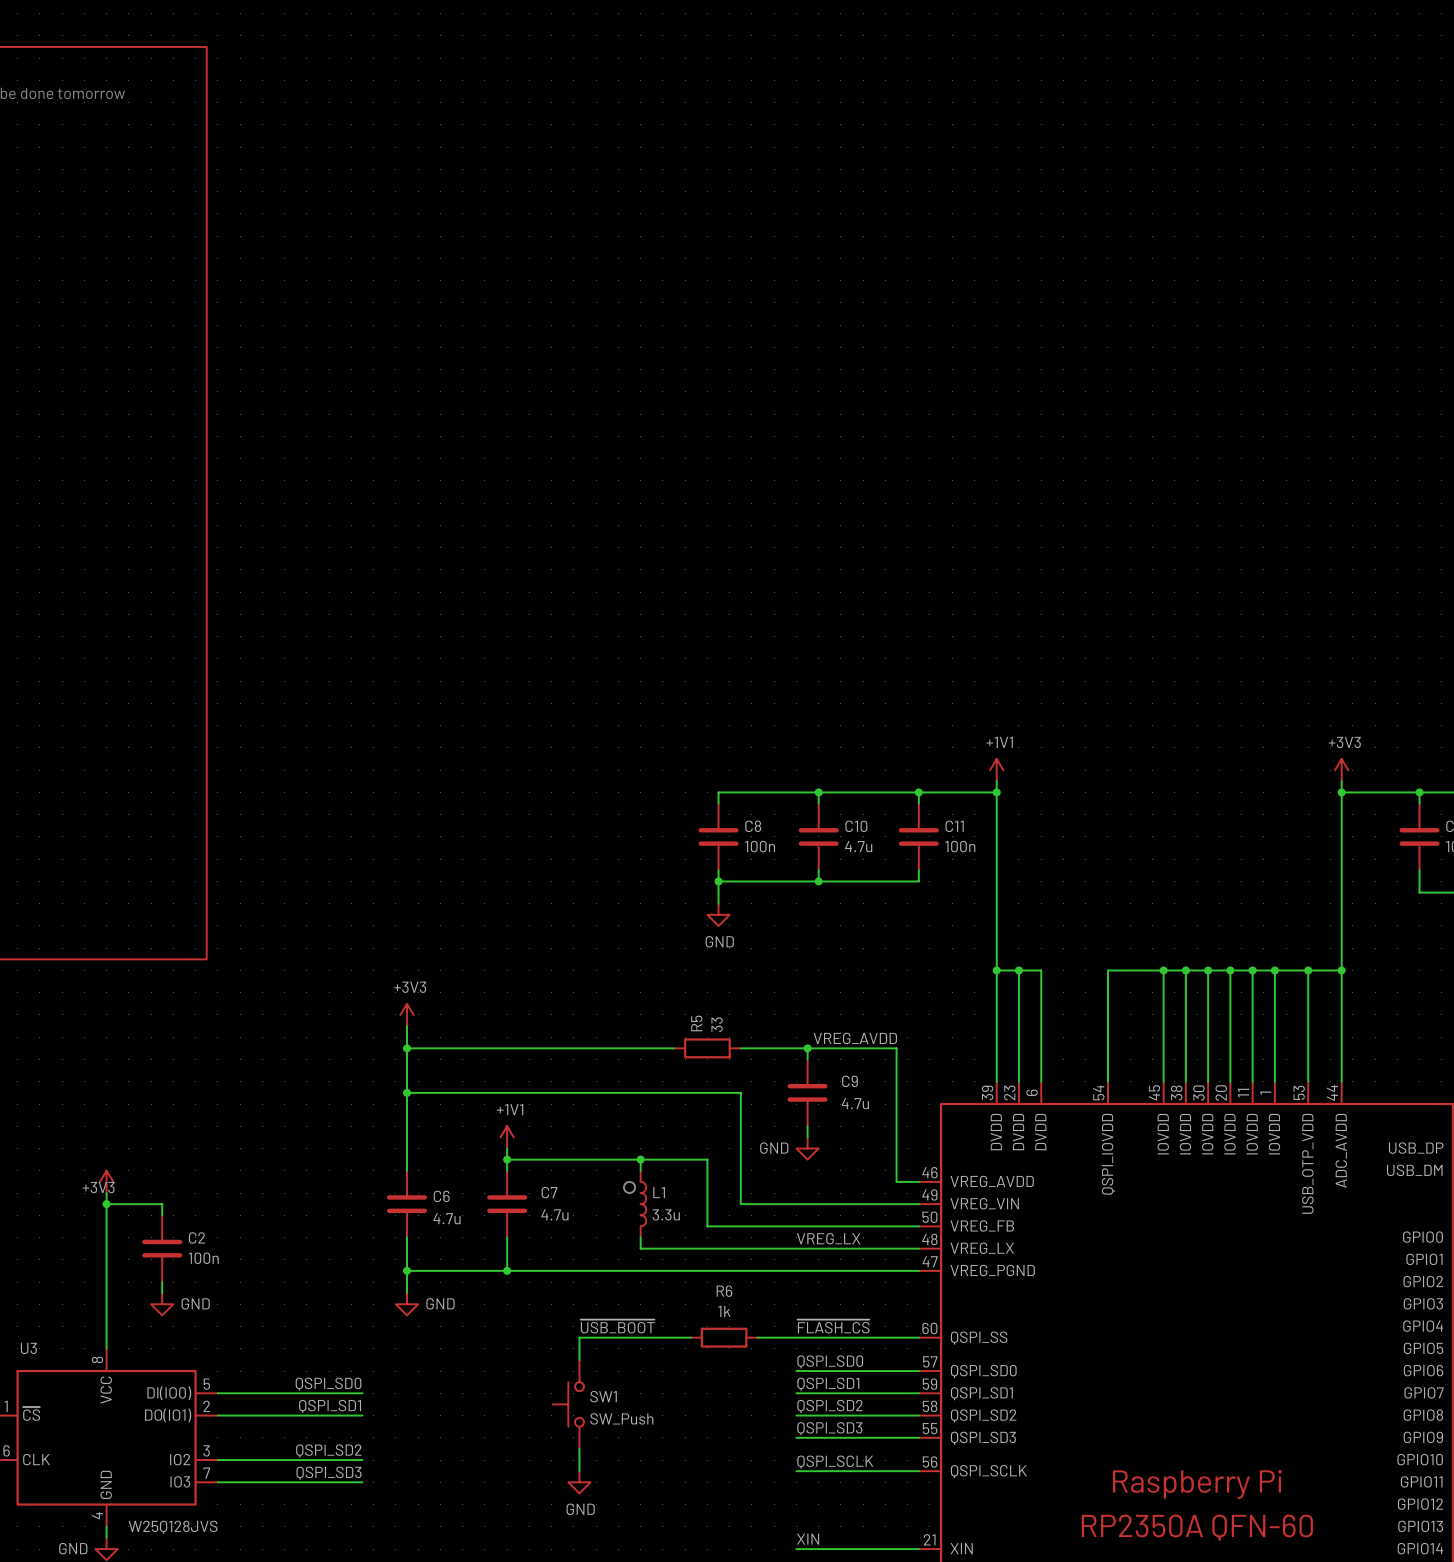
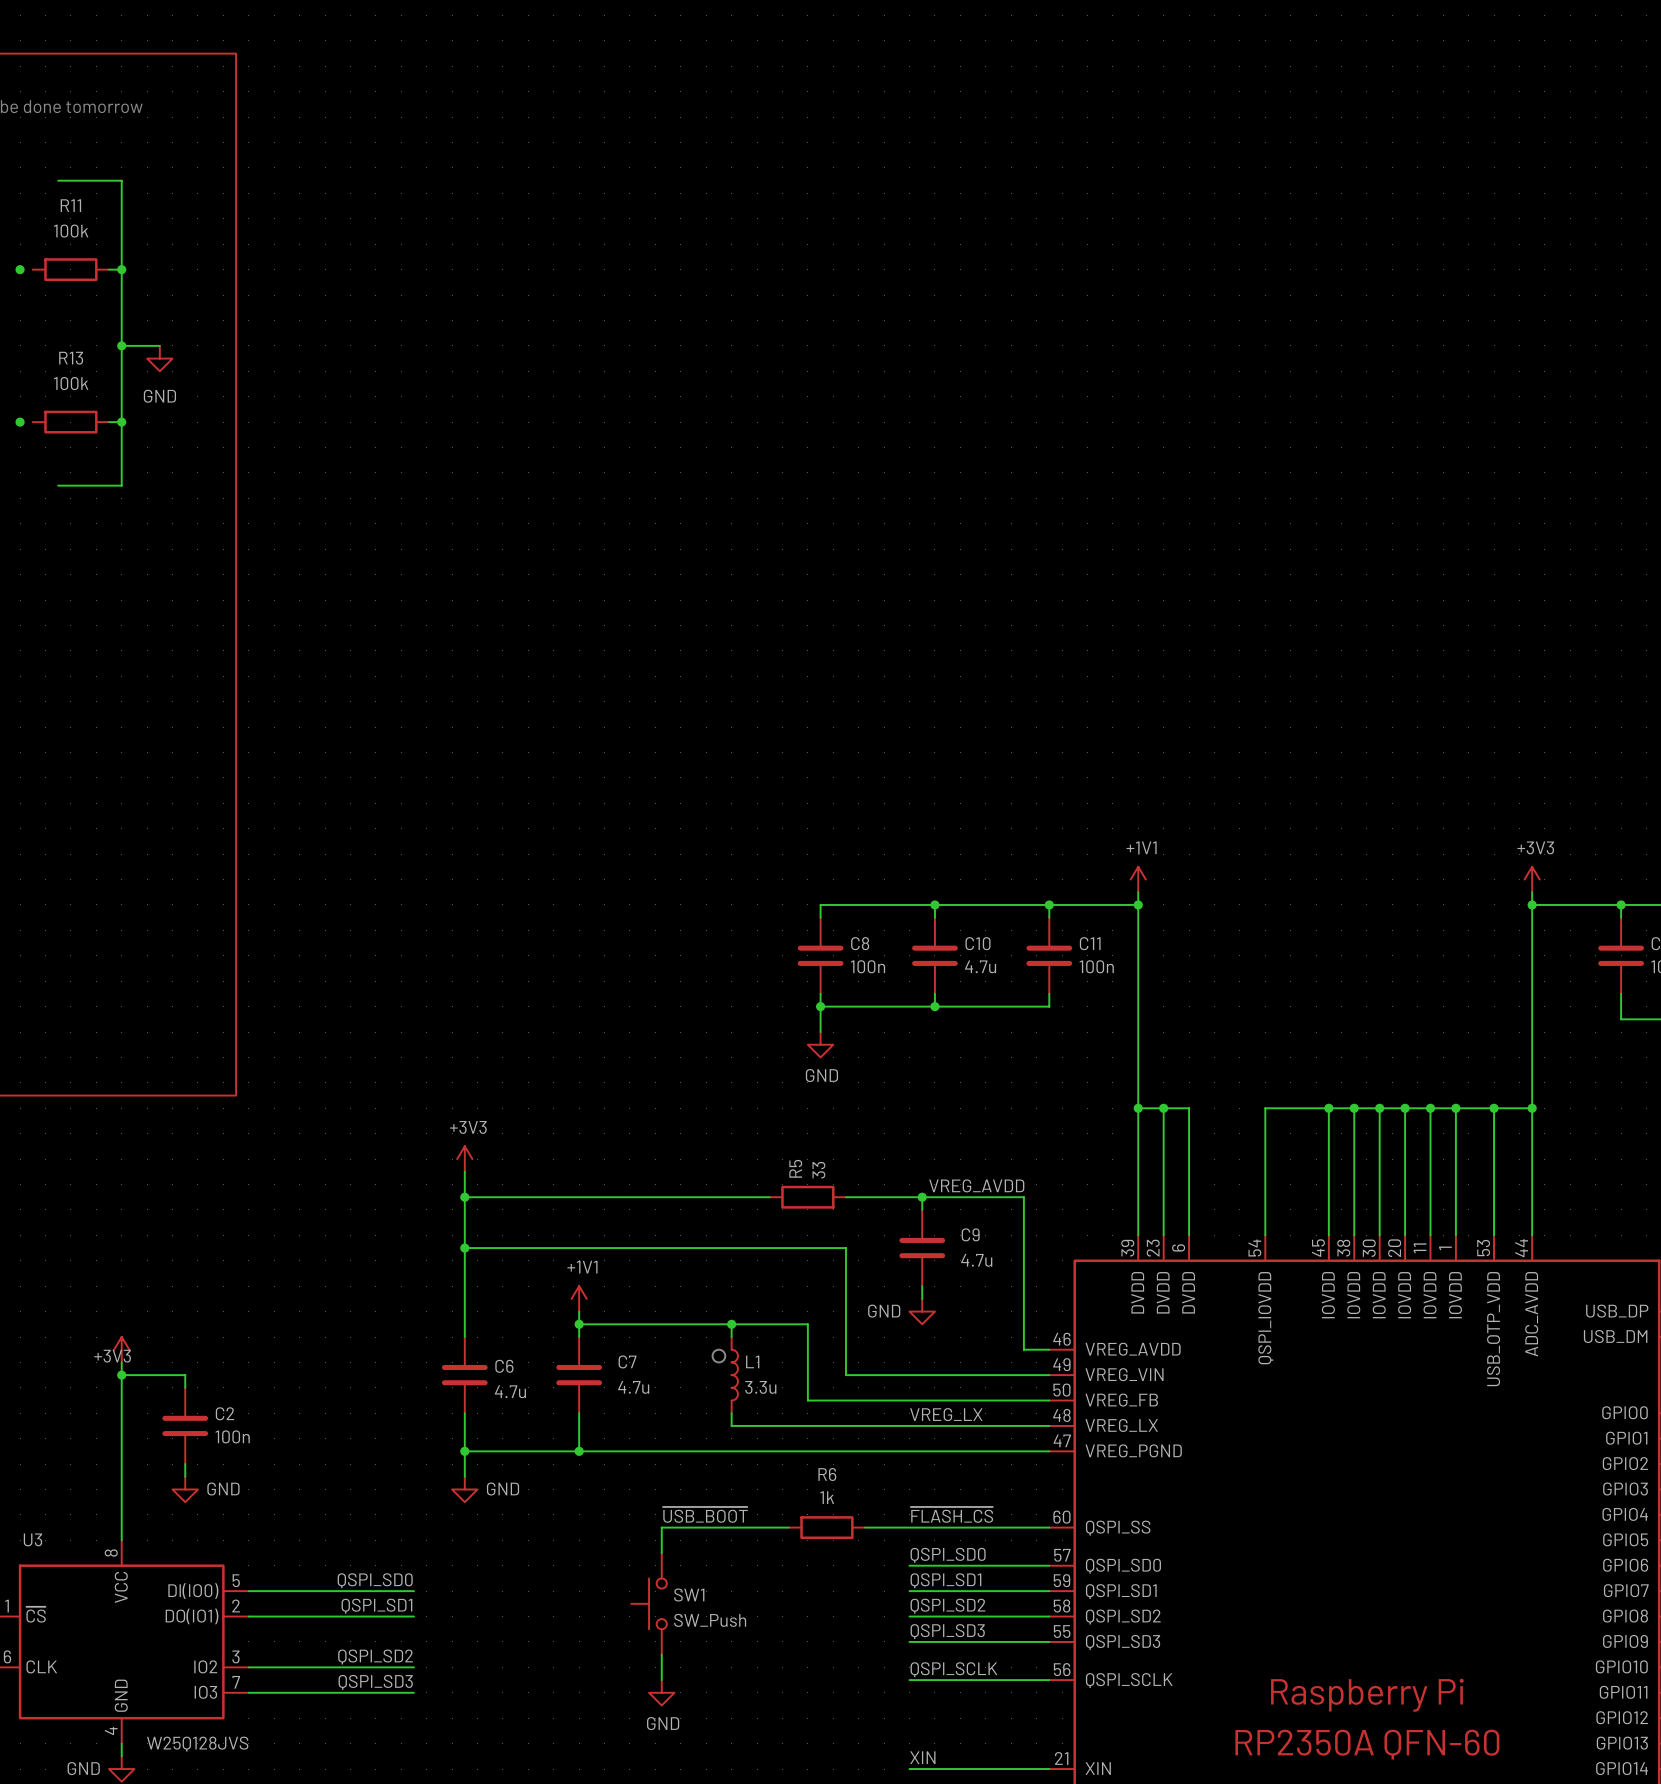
wire: none -> (58, 180) (121, 180) (121, 485) (58, 485)
junction: none -> (20, 269)
R11: none -> 100k (70, 269)
wire: none -> (109, 269) (121, 269)
junction: none -> (121, 269)
wire: none -> (121, 345) (159, 345)
junction: none -> (121, 345)
power symbol: none -> GND (159, 358)
junction: none -> (20, 422)
R13: none -> 100k (70, 422)
wire: none -> (109, 422) (121, 422)
junction: none -> (121, 422)

